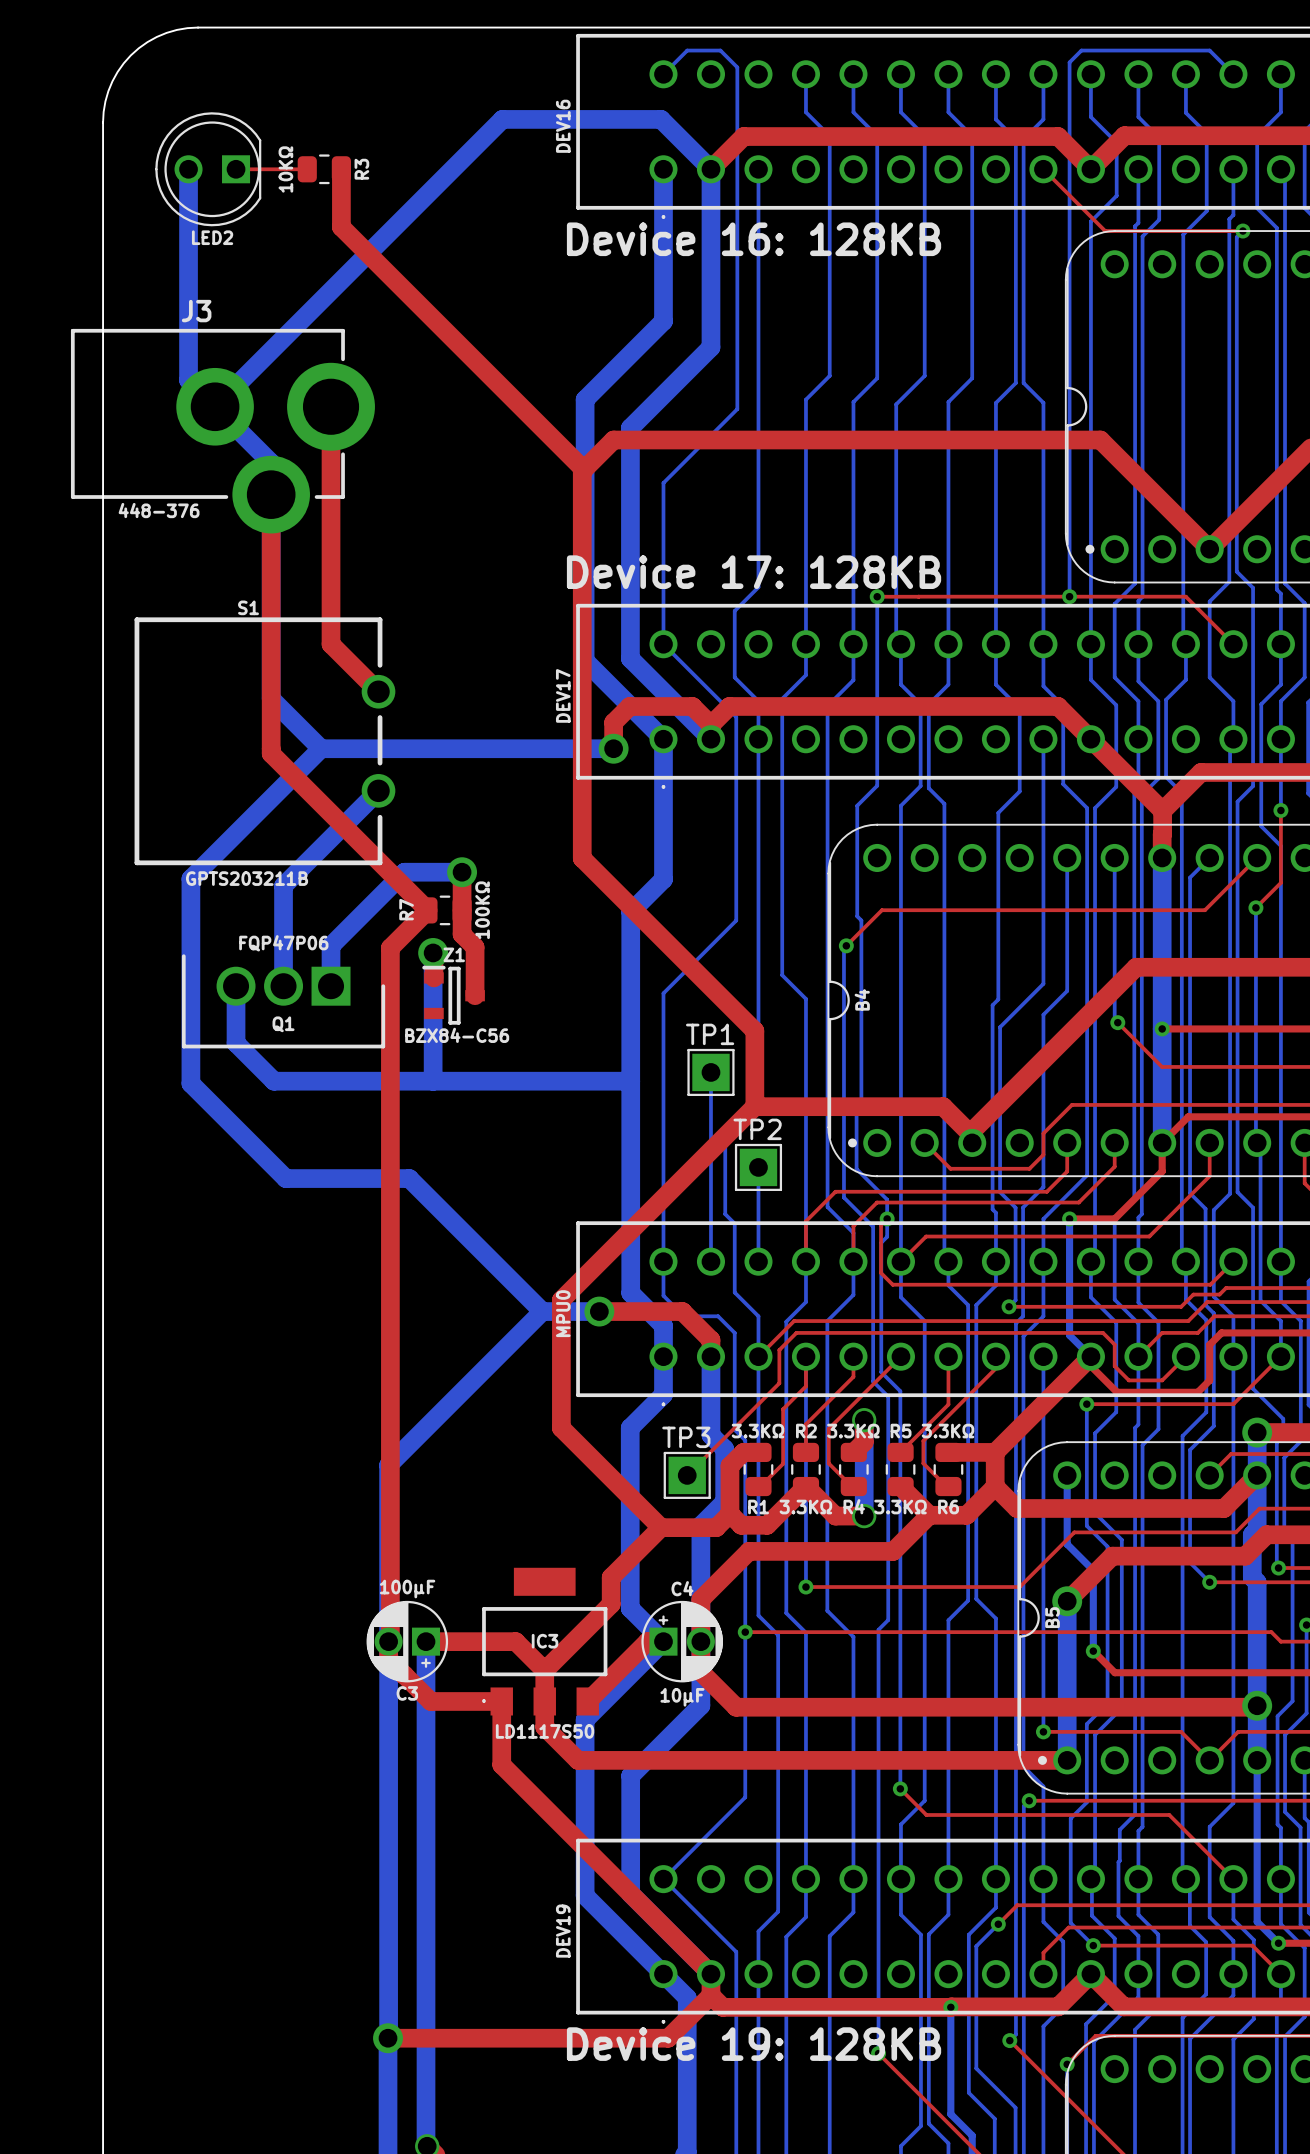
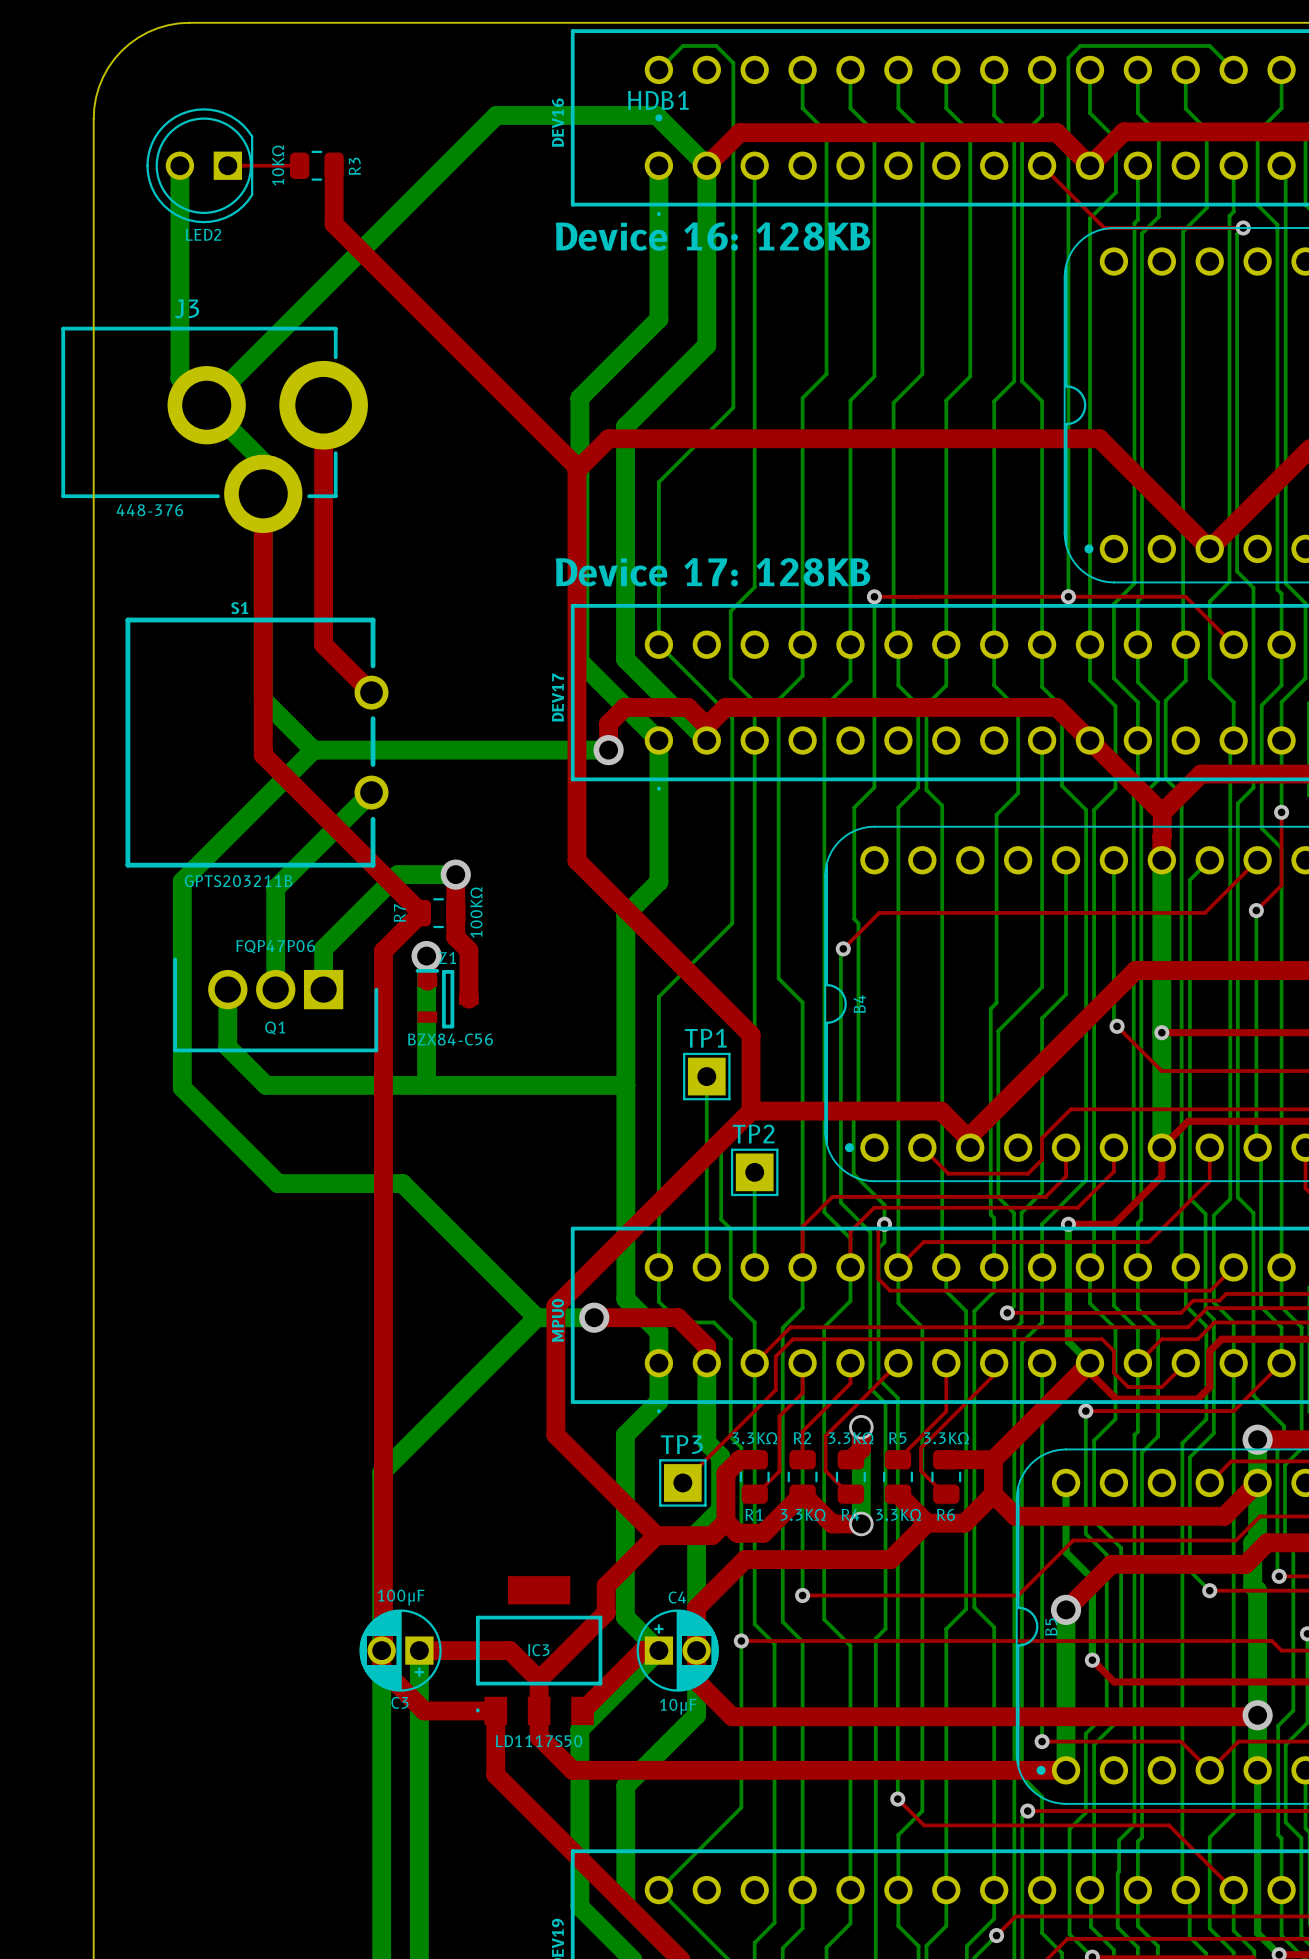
HDB1: none -> (658, 117)

